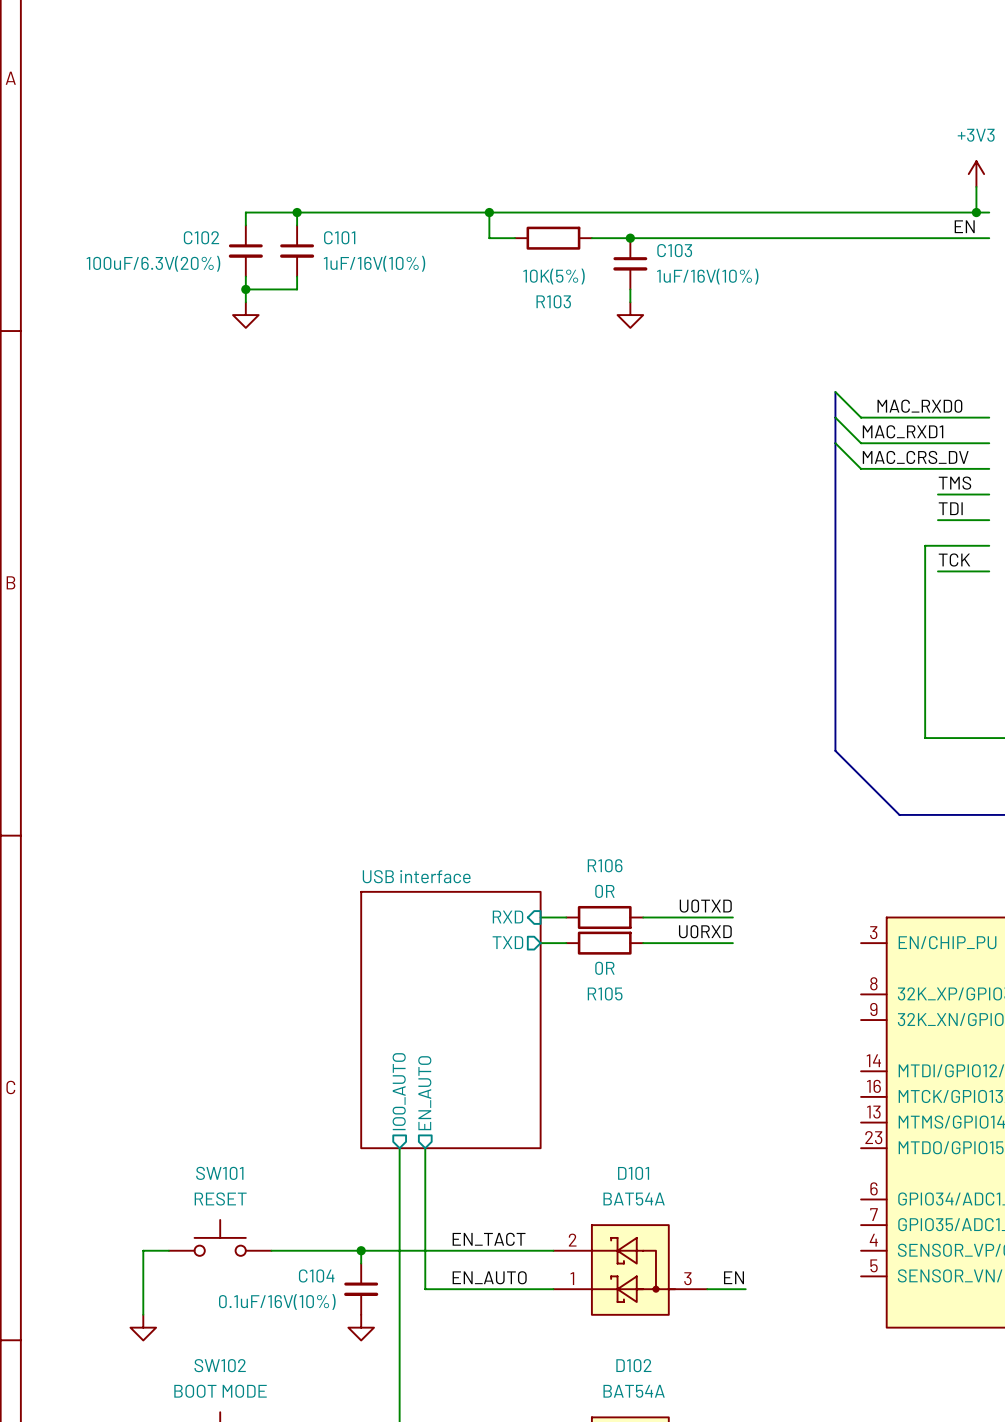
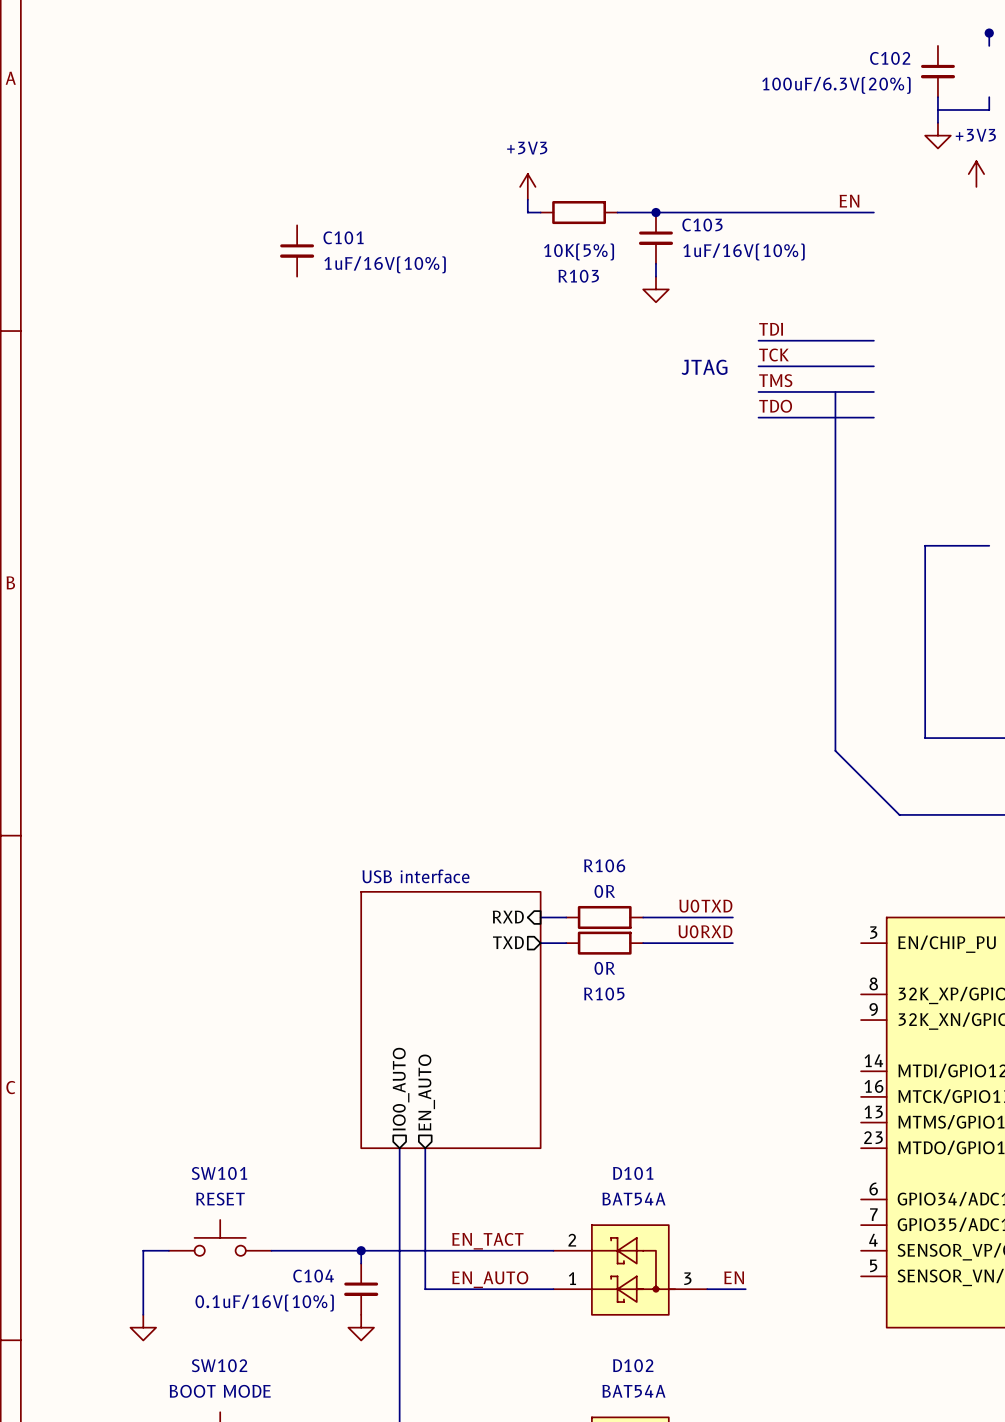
wire: none -> (989, 33) (989, 45)
junction: none -> (989, 33)
wire: none -> (989, 97) (989, 110) (937, 110)
power symbol: none -> (937, 135)
power symbol: none -> +3V3 (527, 186)
wire: (976, 186) (976, 212) -> (937, 97) (937, 122)
wire: (297, 212) (297, 225) -> none
junction: (297, 212) -> none
wire: (489, 212) (489, 238) (515, 238) -> none
junction: (489, 212) -> none
wire: (527, 212) (245, 212) (245, 225) -> (527, 212) (527, 199)
wire: (540, 212) (617, 212) -> none
wire: (873, 212) (989, 212) -> (758, 340) (873, 340)
junction: (976, 212) -> none
label position: EN (964, 226) -> EN (849, 201)
R103 position: (553, 238) -> (579, 212)
wire: (591, 238) (989, 238) -> none
junction position: (630, 238) -> (655, 212)
C102 position: (245, 250) -> (937, 71)
C103 position: (630, 263) -> (655, 238)
wire: (245, 276) (245, 302) -> none
wire: (297, 276) (297, 289) (245, 289) -> none
junction: (245, 289) -> none
wire: (630, 289) (630, 302) -> (655, 263) (655, 276)
power symbol: (245, 315) -> none
power symbol position: (630, 315) -> (655, 289)
label: none -> TDI (771, 329)
label: none -> TCK (774, 354)
wire: none -> (758, 366) (873, 366)
text: none -> JTAG (704, 367)
wire: (835, 391) (861, 417) -> (758, 417) (861, 417)
label: none -> TDO (775, 406)
label: MAC_RXD0 (919, 406) -> none
wire: (835, 417) (861, 443) (989, 443) -> none
wire: (873, 417) (989, 417) -> (758, 391) (873, 391)
label: MAC_RXD1 (903, 431) -> none
wire: (835, 443) (861, 468) (989, 468) -> none
label: MAC_CRS_DV (915, 457) -> none
label position: TMS (954, 483) -> TMS (775, 380)
wire: (937, 494) (989, 494) -> none
label: TDI (950, 508) -> none
wire: (937, 520) (989, 520) -> none
label: TCK (954, 560) -> none
wire: (937, 571) (989, 571) -> none

